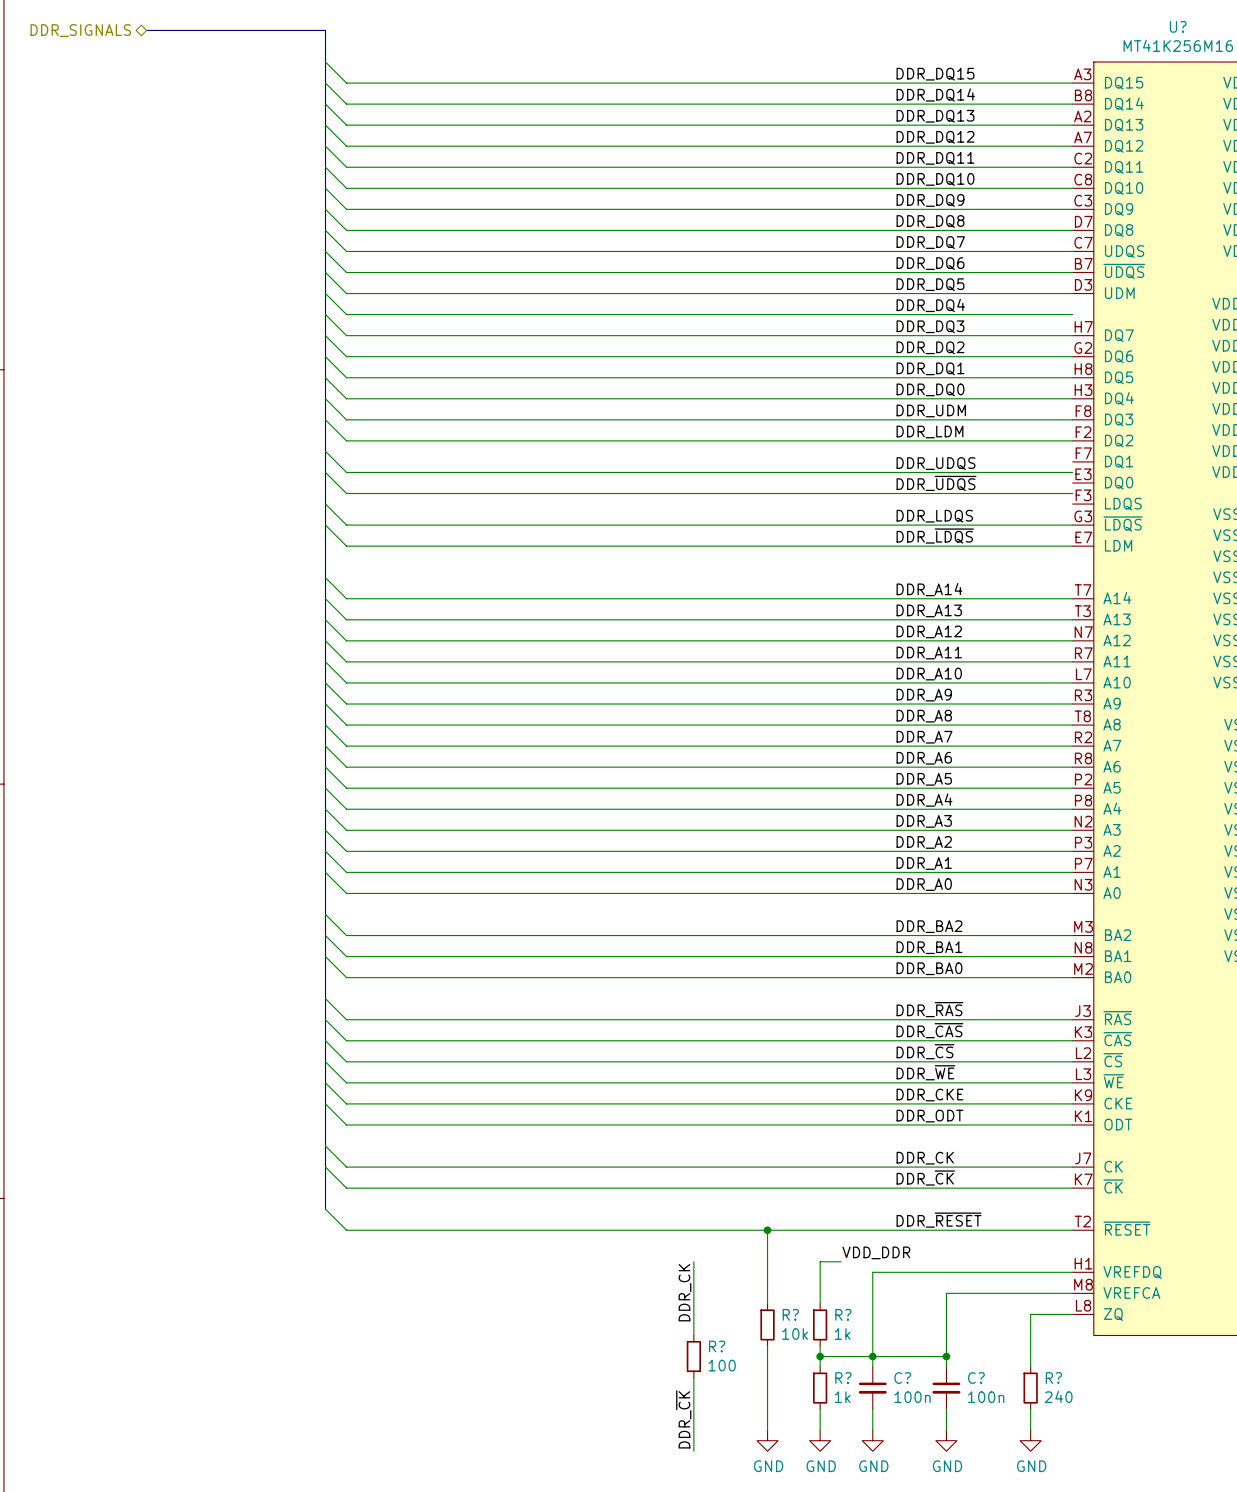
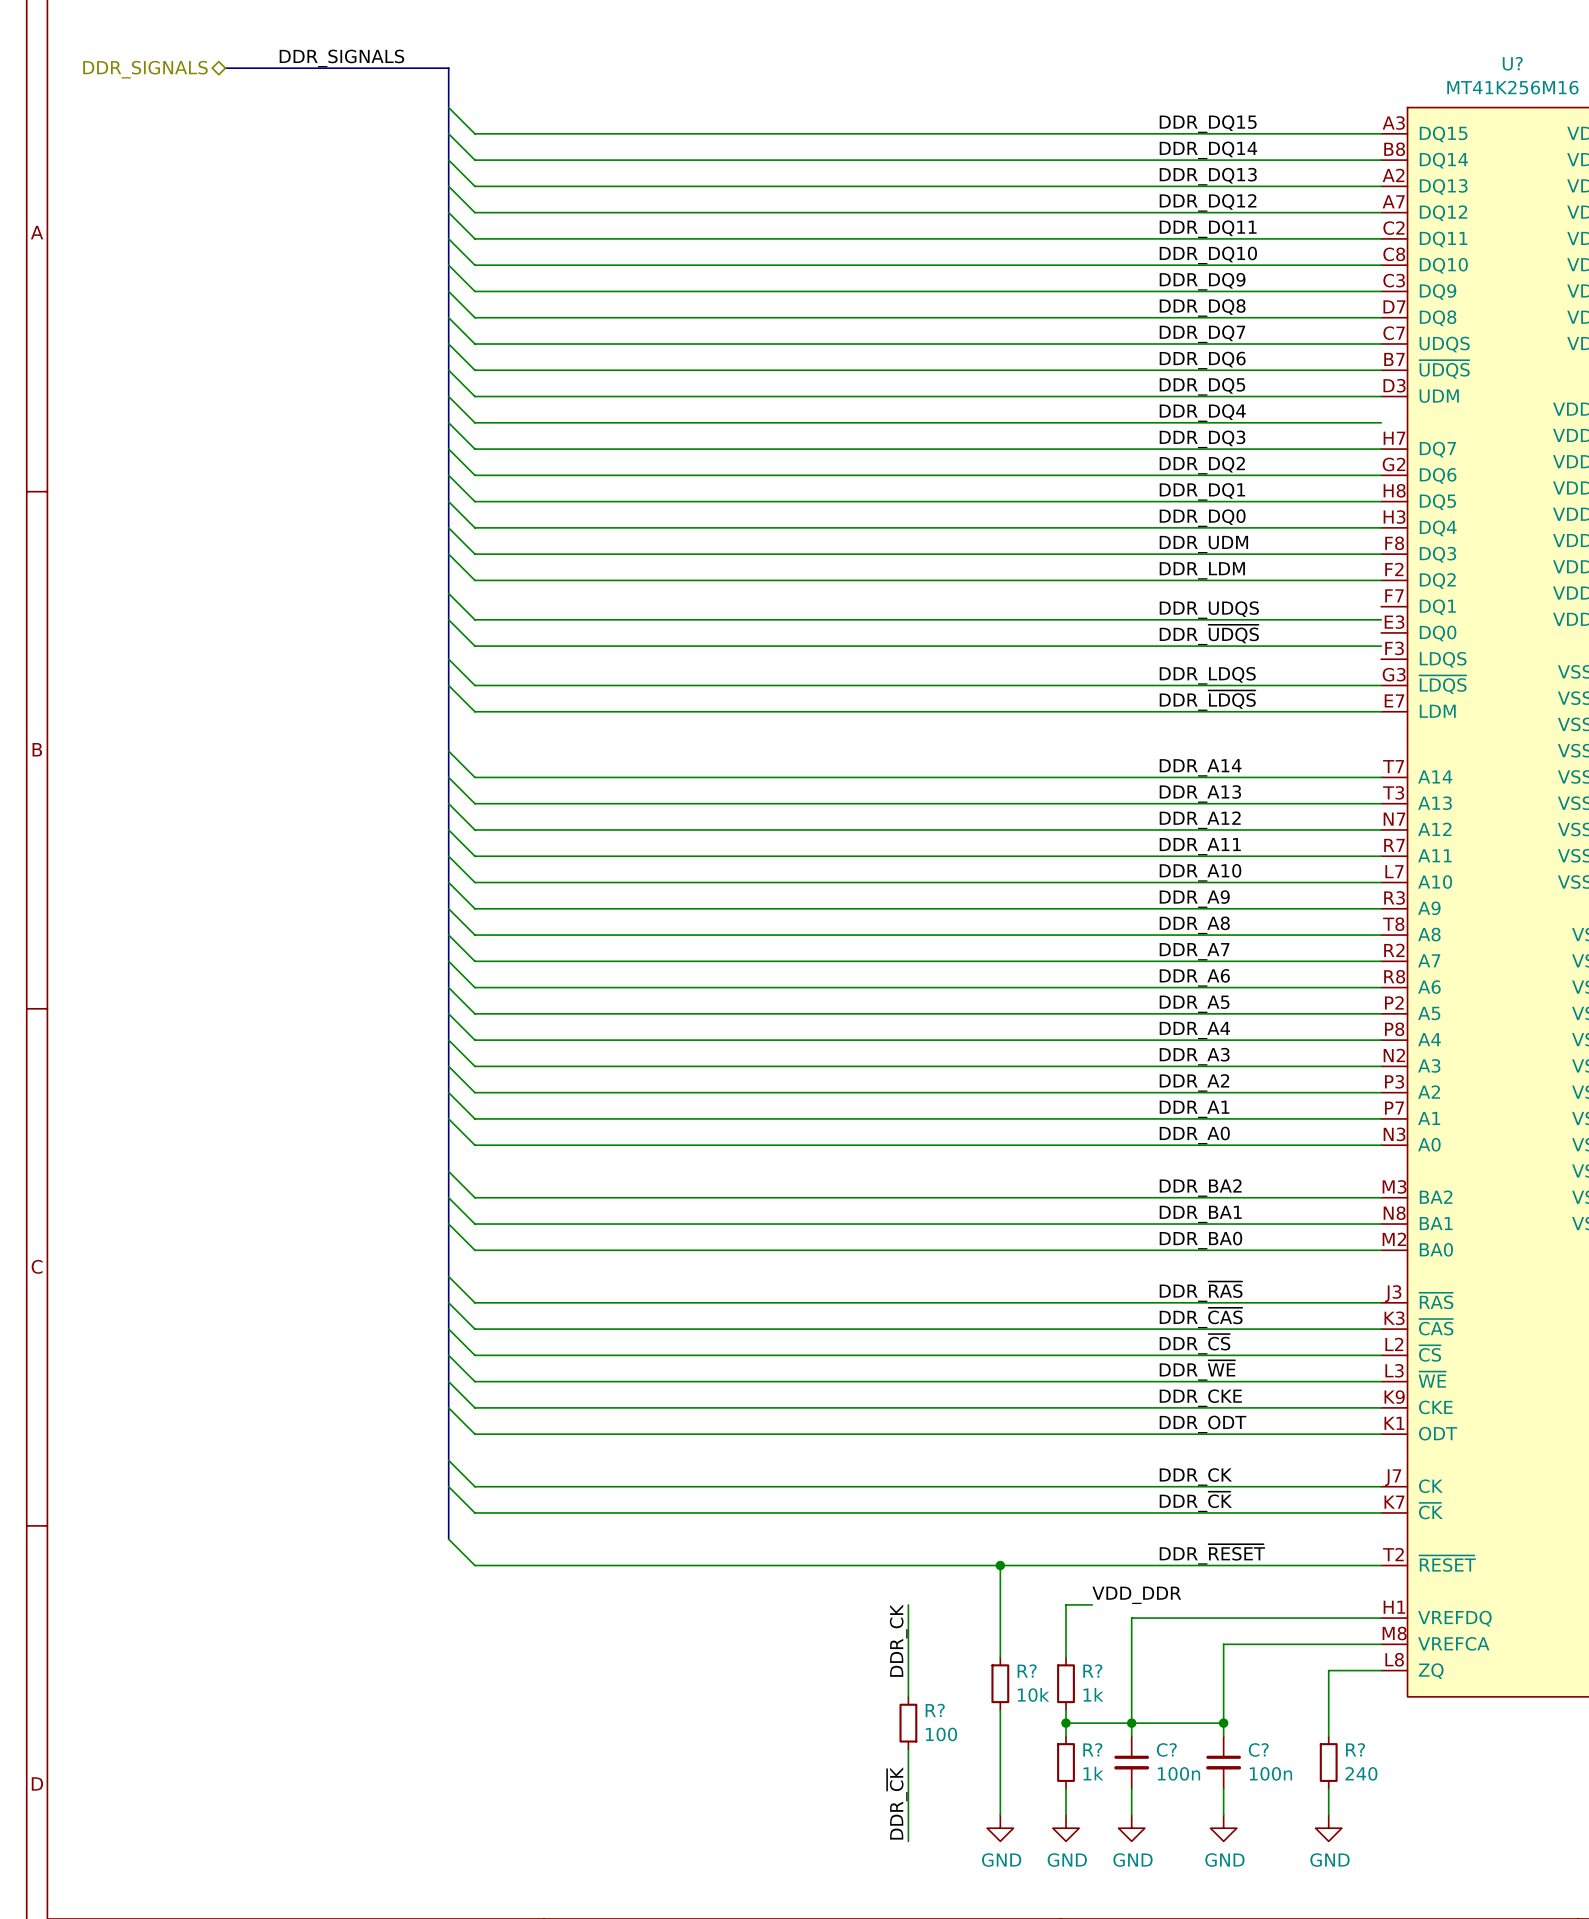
label: none -> DDR_SIGNALS (341, 58)

